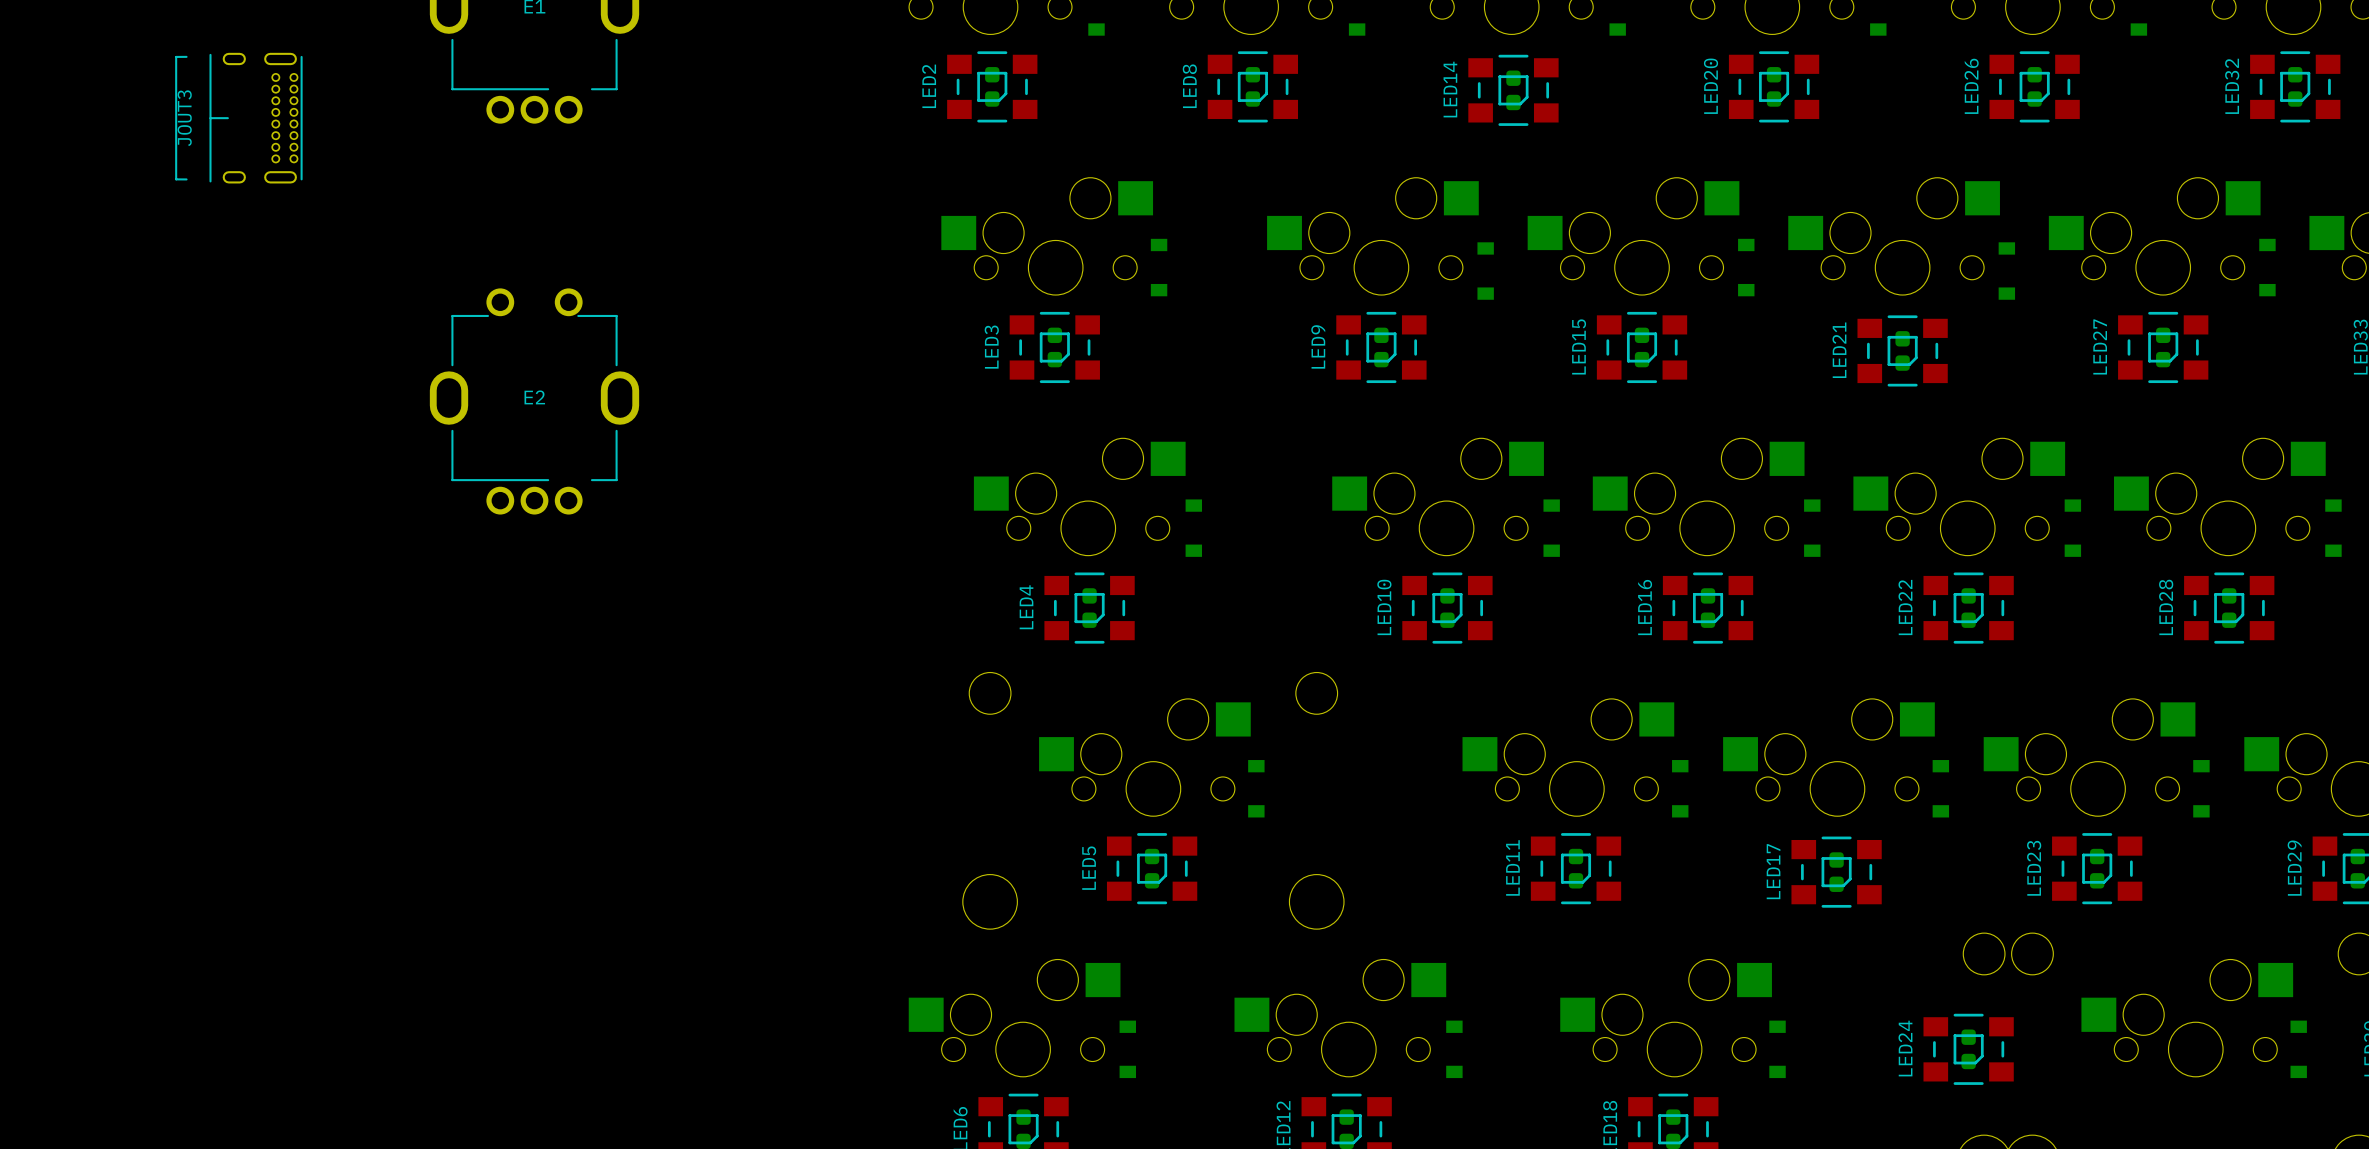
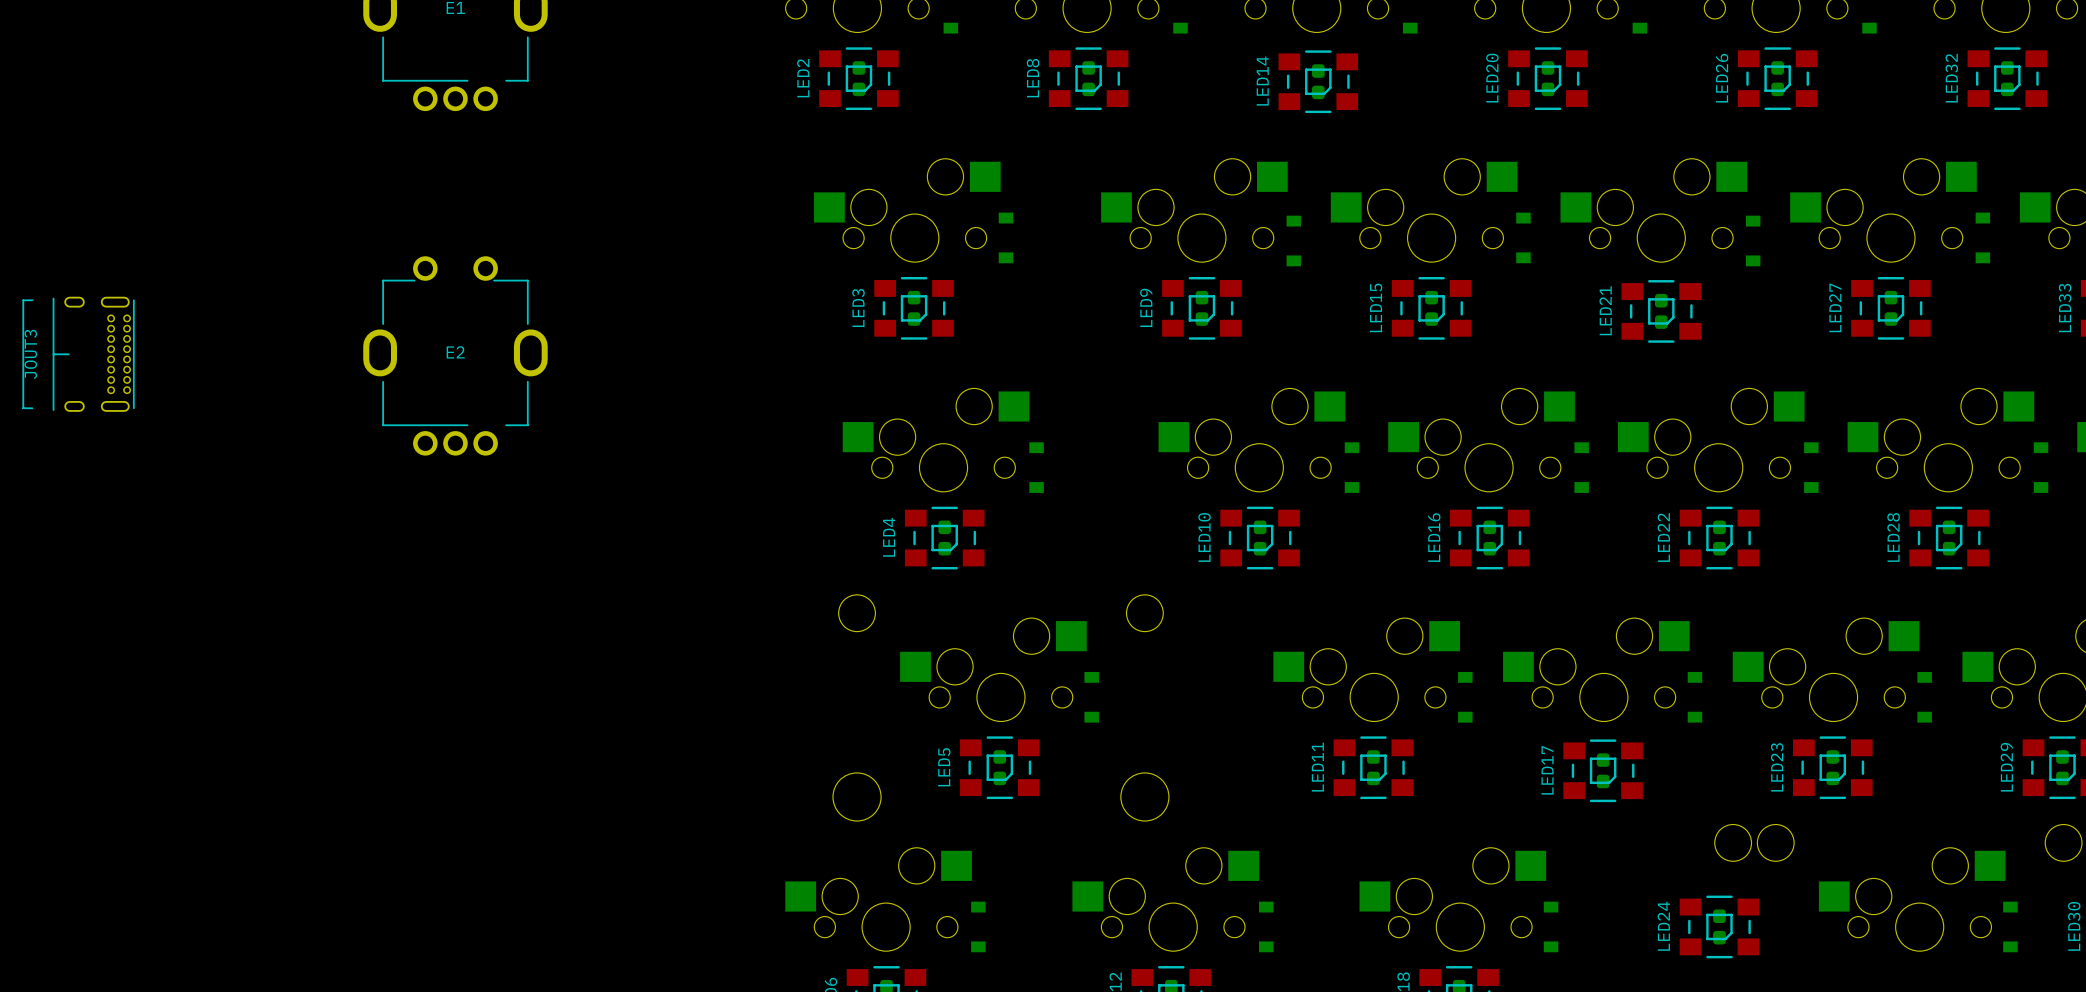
JOUT3 position: (238, 118) -> (78, 354)

